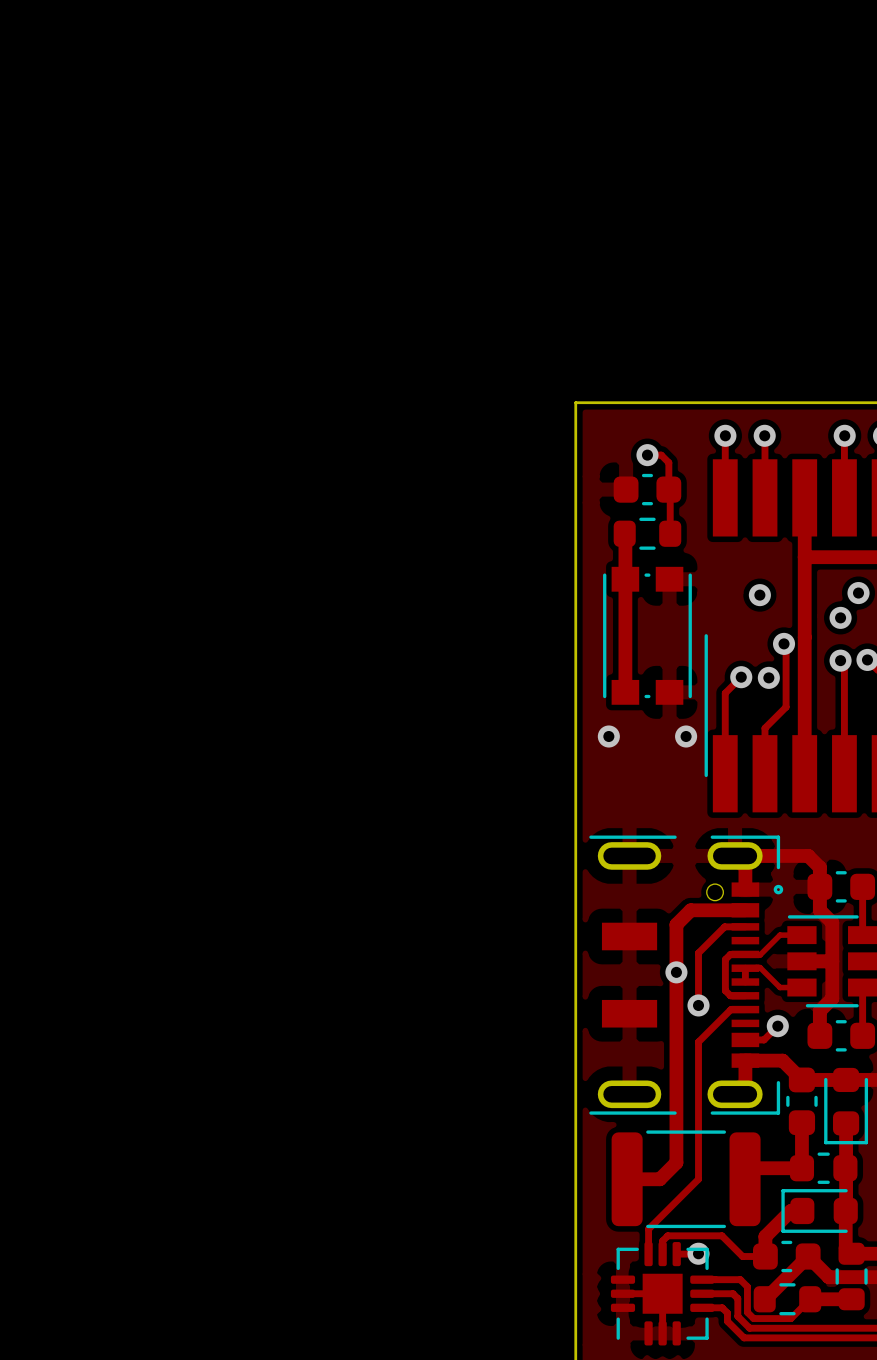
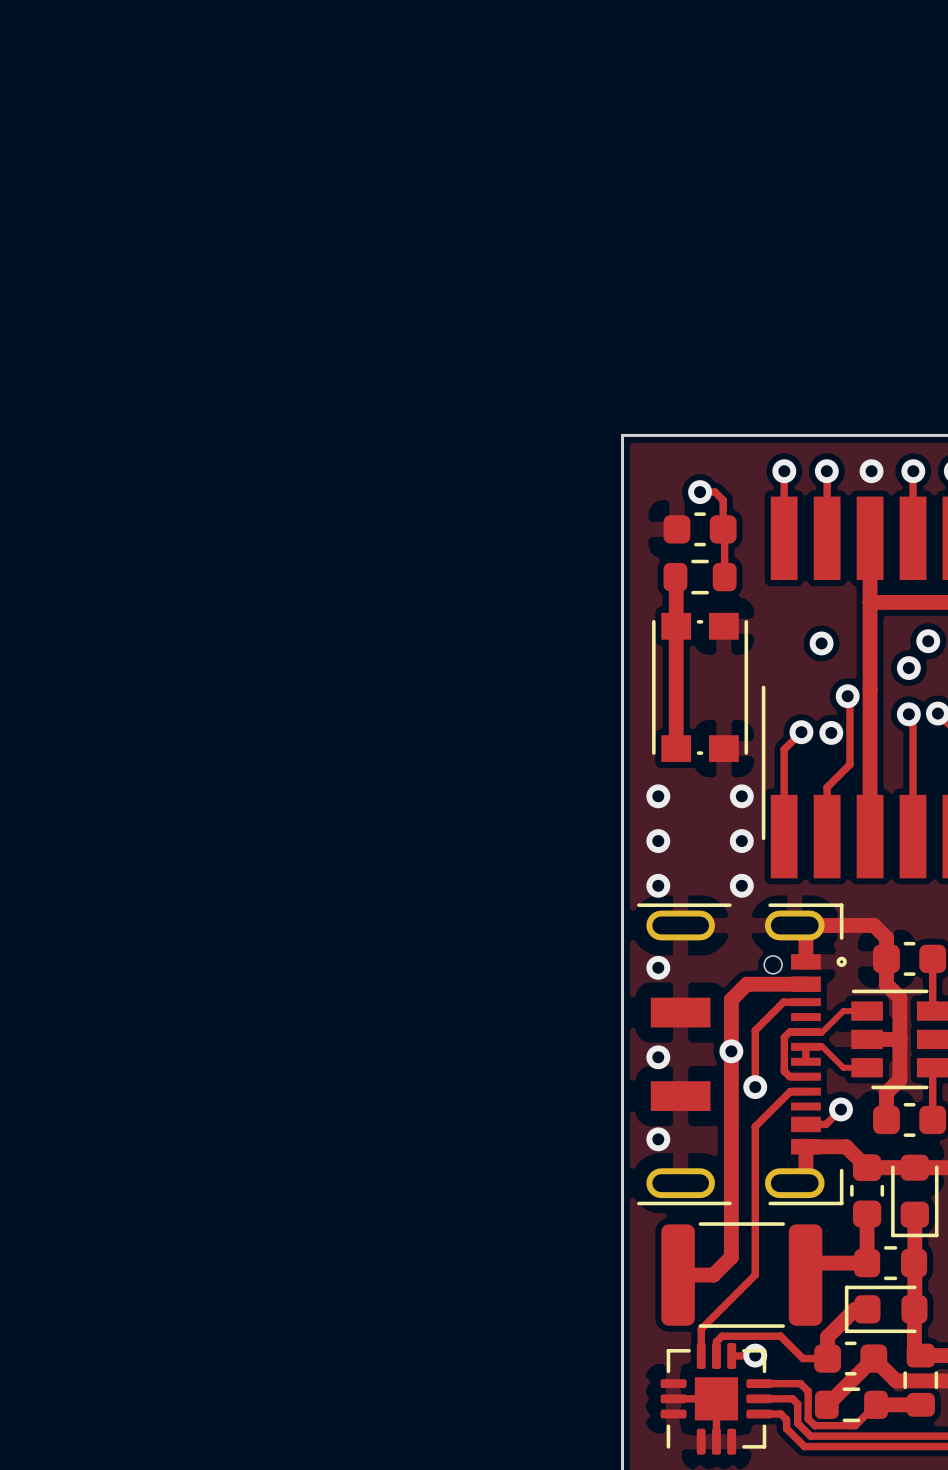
via: none -> (871, 471)
via: none -> (658, 841)
via: none -> (741, 841)
via: none -> (658, 885)
via: none -> (741, 885)
via: none -> (658, 967)
via: none -> (658, 1057)
via: none -> (658, 1139)

